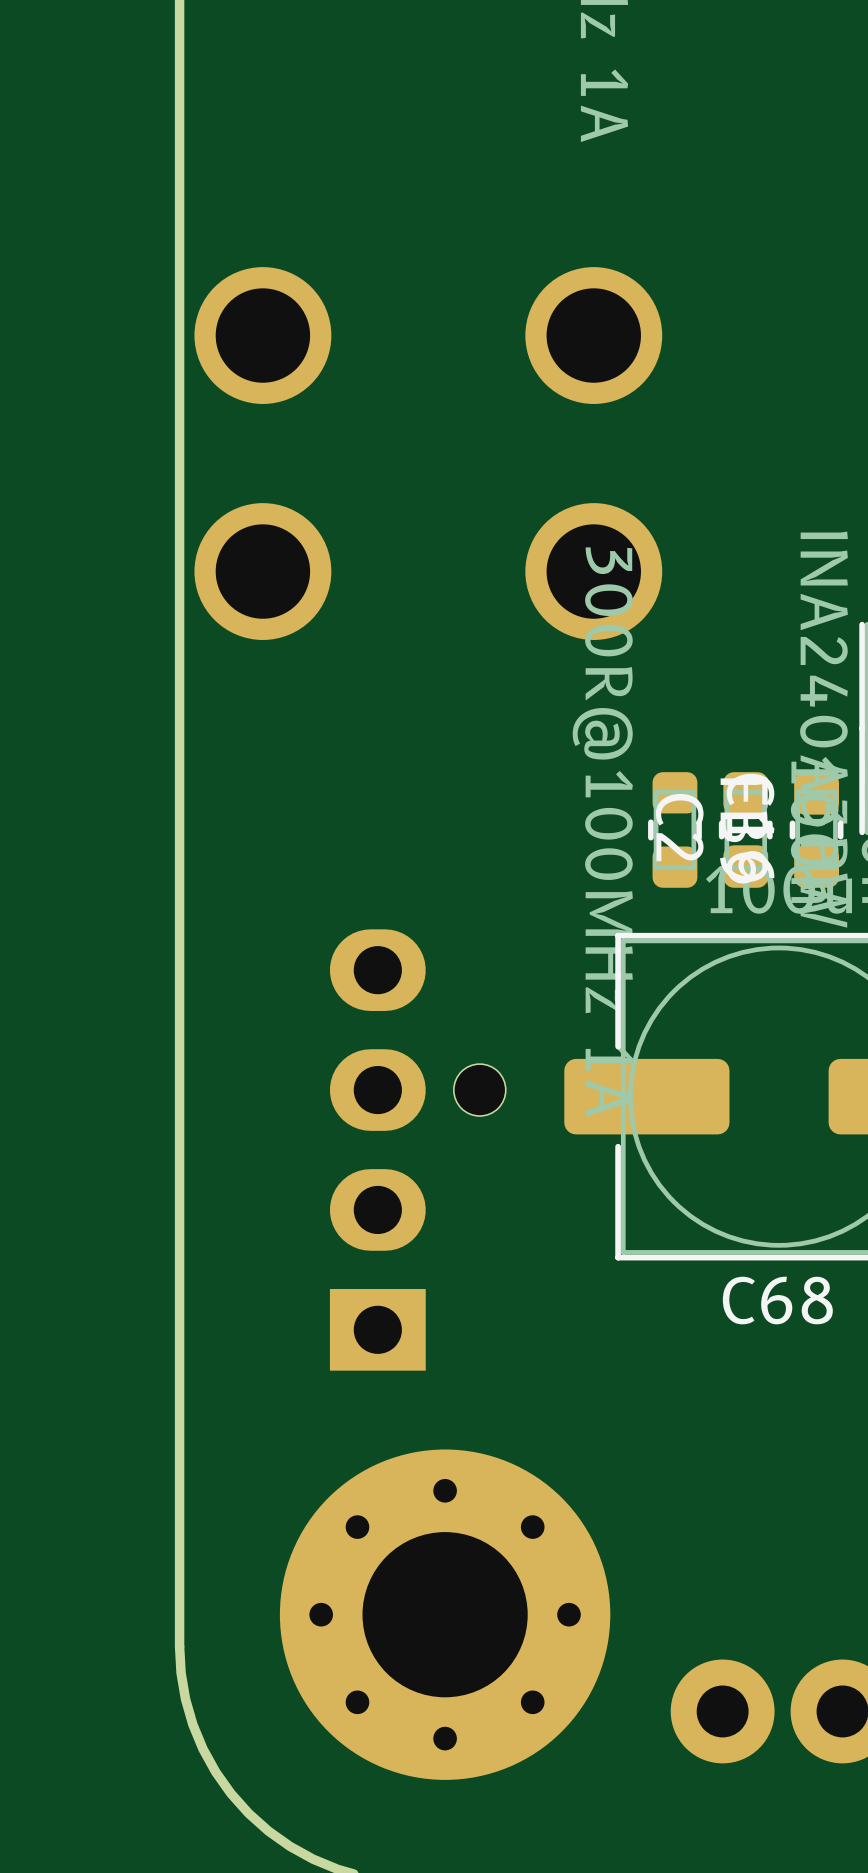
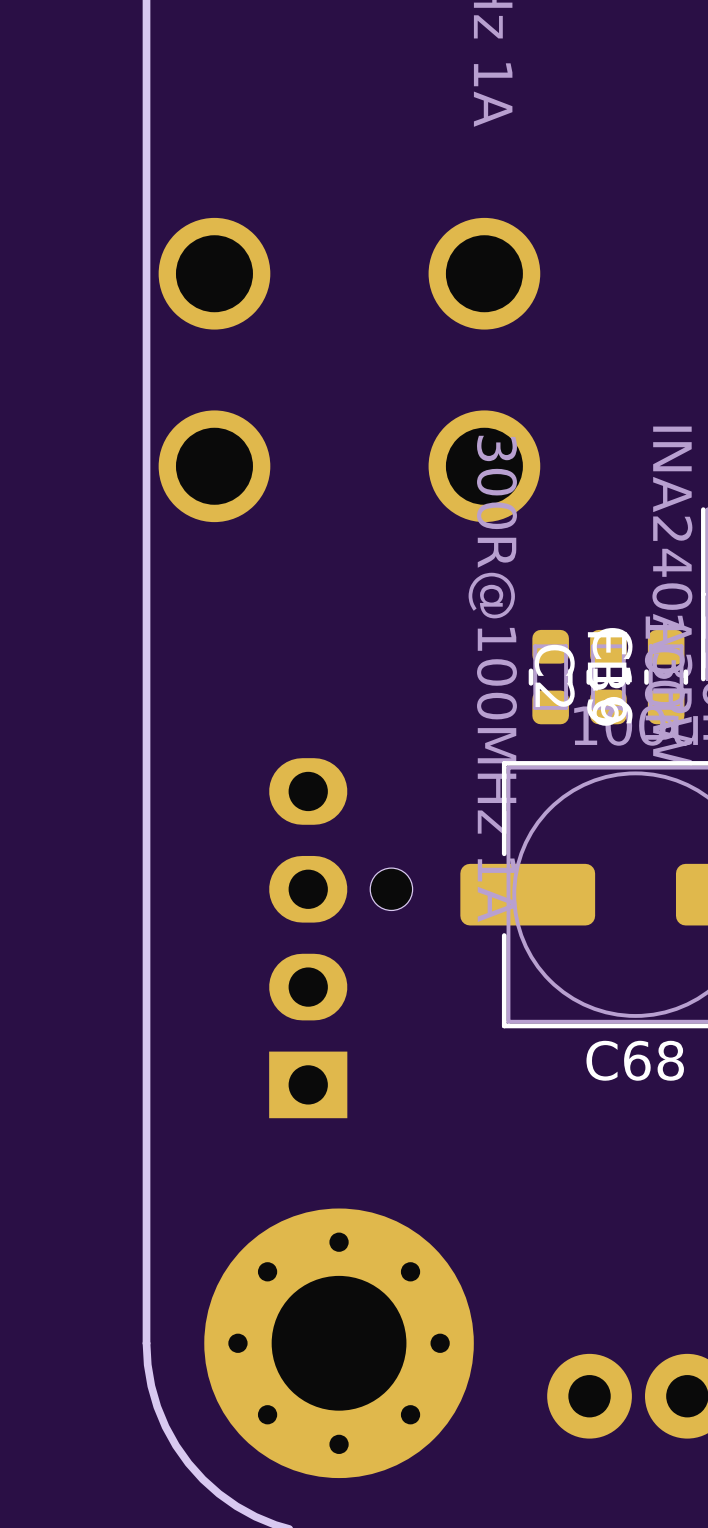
part position: (445, 1614) -> (339, 1343)

